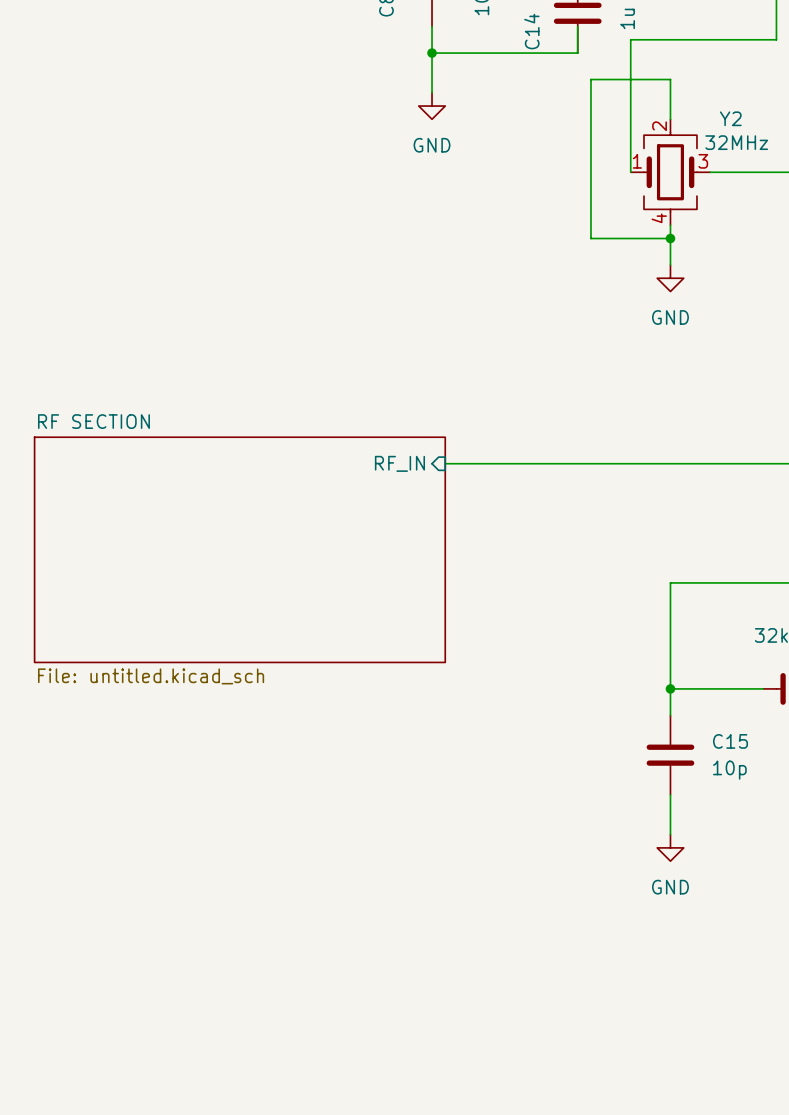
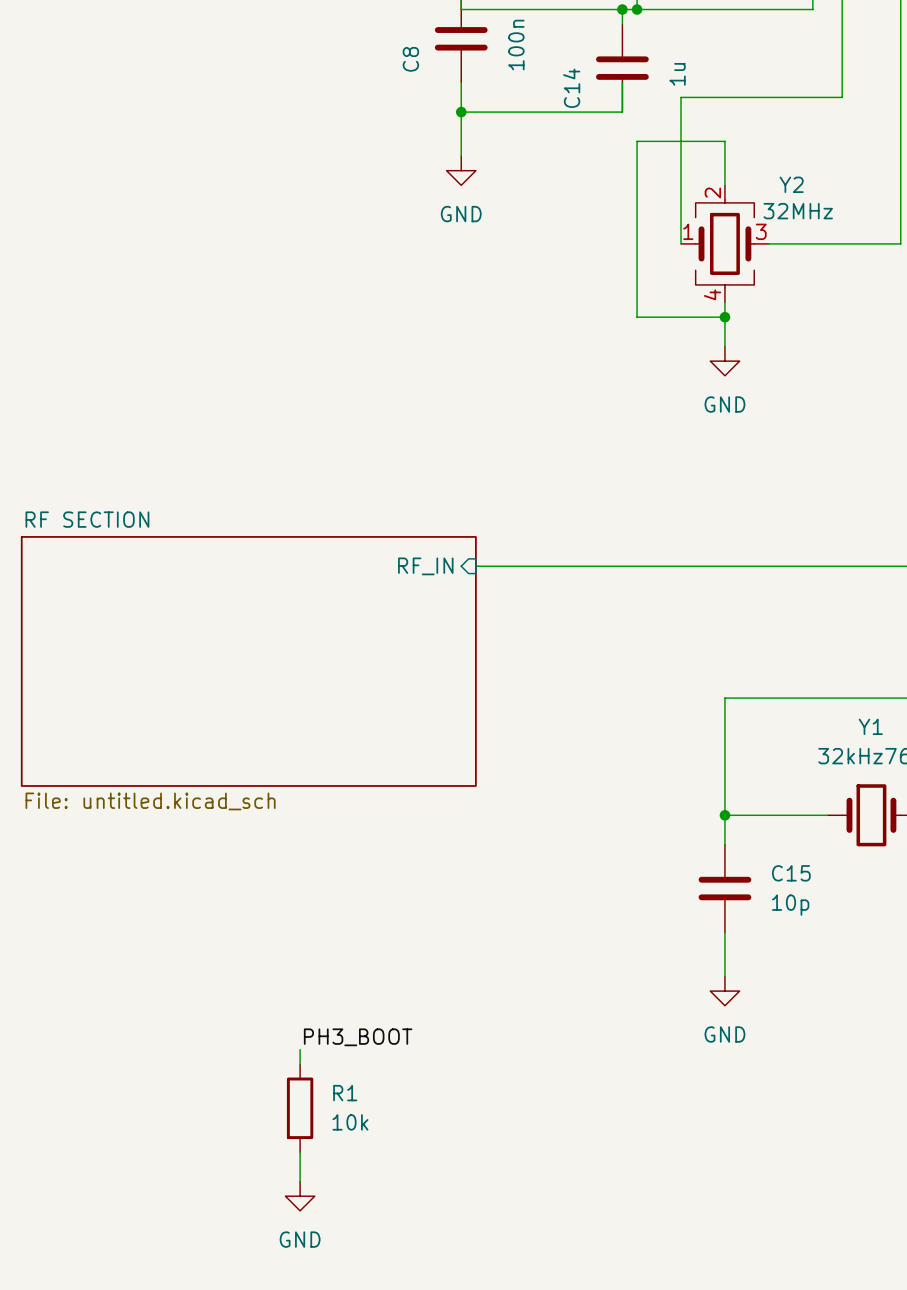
label: none -> PH3_BOOT (358, 1037)
wire: none -> (300, 1049) (300, 1064)
R1: none -> 10k (300, 1108)
wire: none -> (300, 1152) (300, 1181)
power symbol: none -> GND (300, 1196)

